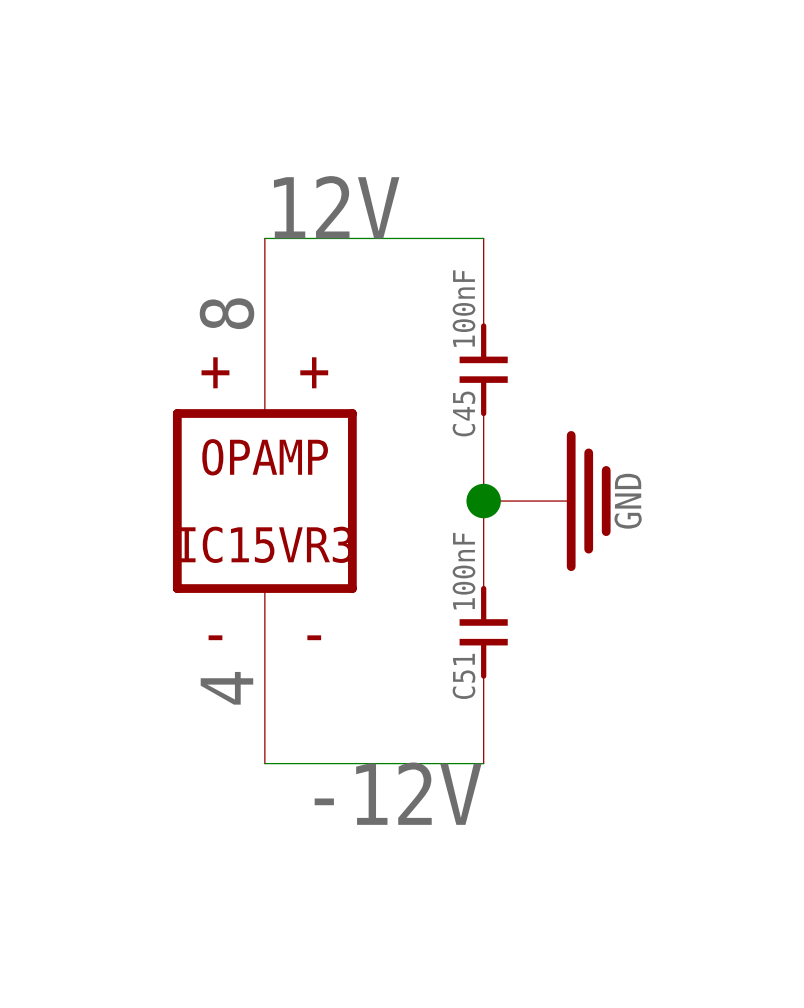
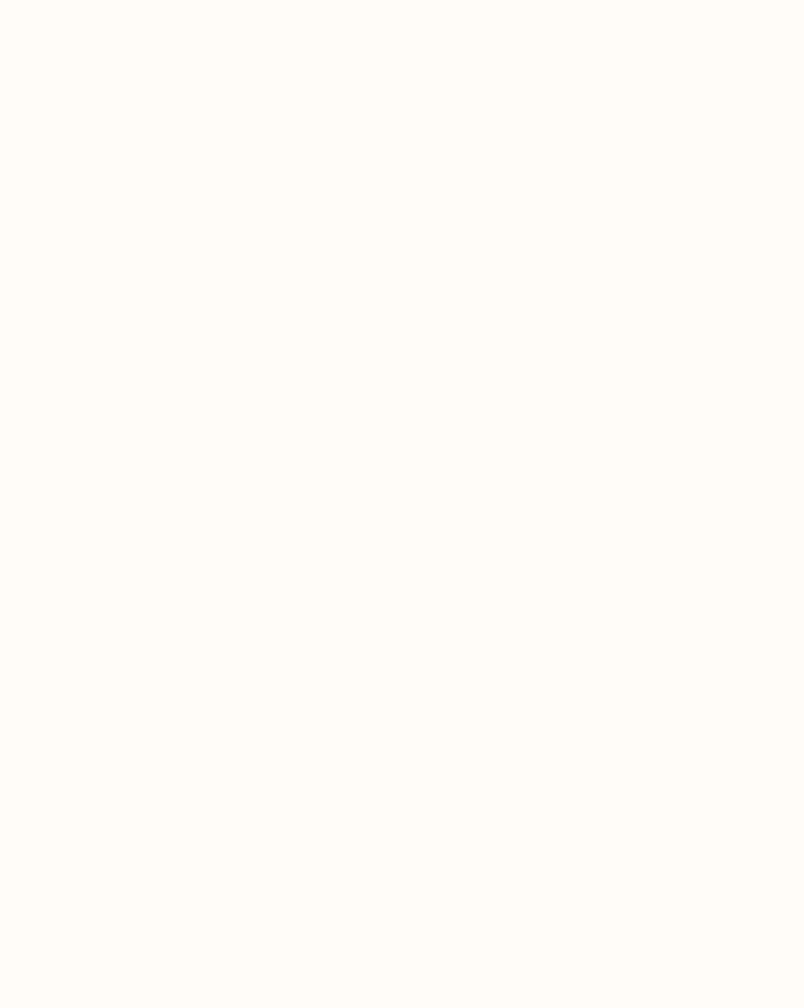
label: 12V (336, 207) -> none
wire: (264, 238) (483, 238) -> none
C45: 100nF (483, 369) -> none
IC15VR3: (264, 501) -> none
junction: (483, 501) -> none
power symbol: GND (547, 501) -> none
C51: 100nF (483, 632) -> none
wire: (264, 763) (483, 763) -> none
label: -12V (398, 793) -> none

